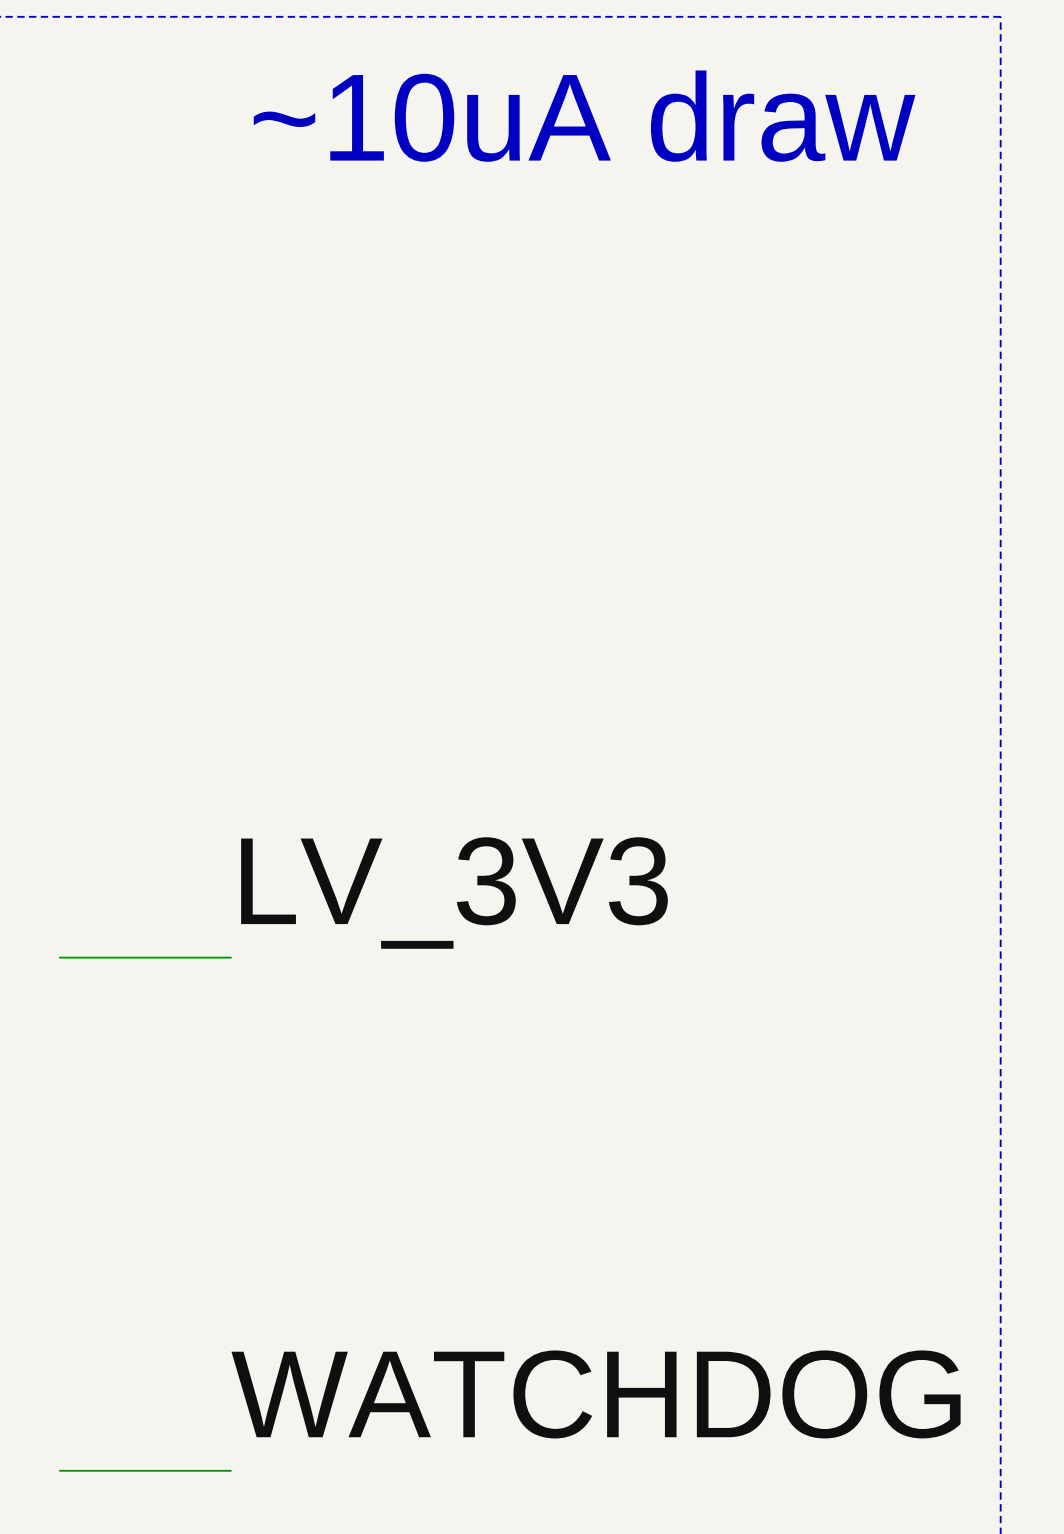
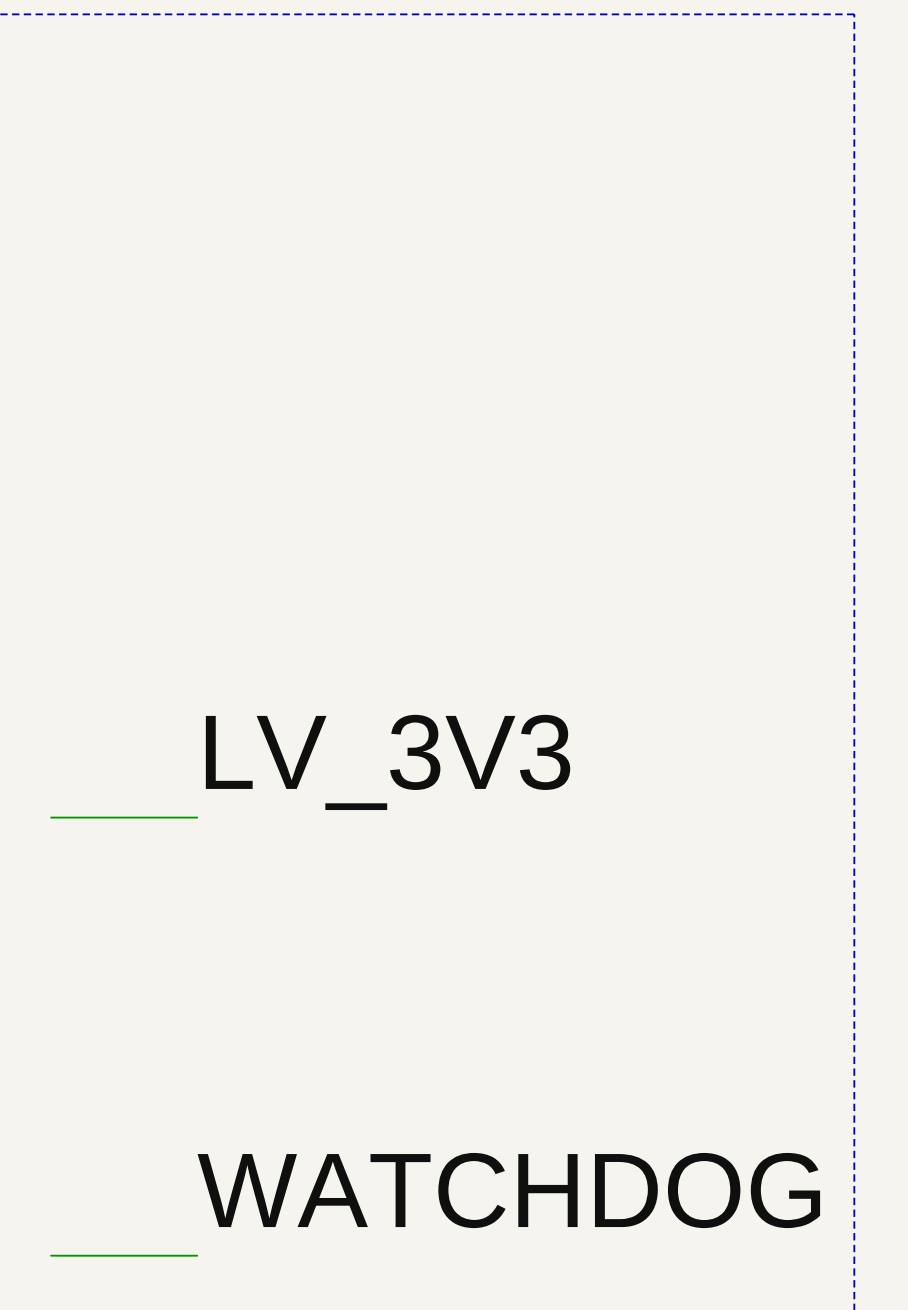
text: ~10uA draw (584, 116) -> none

